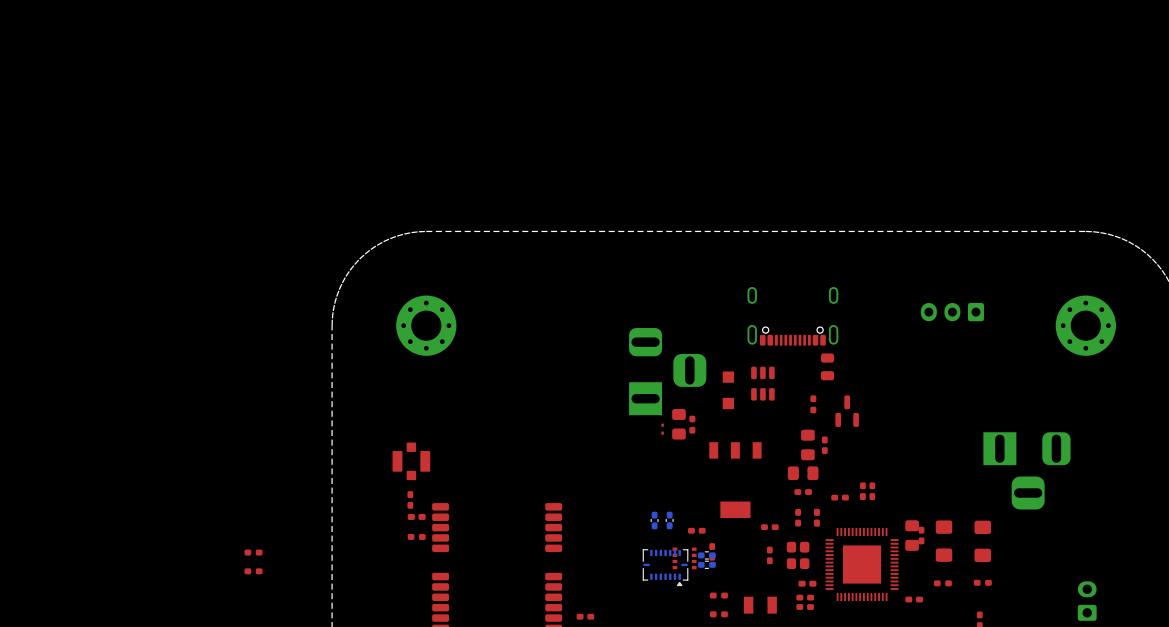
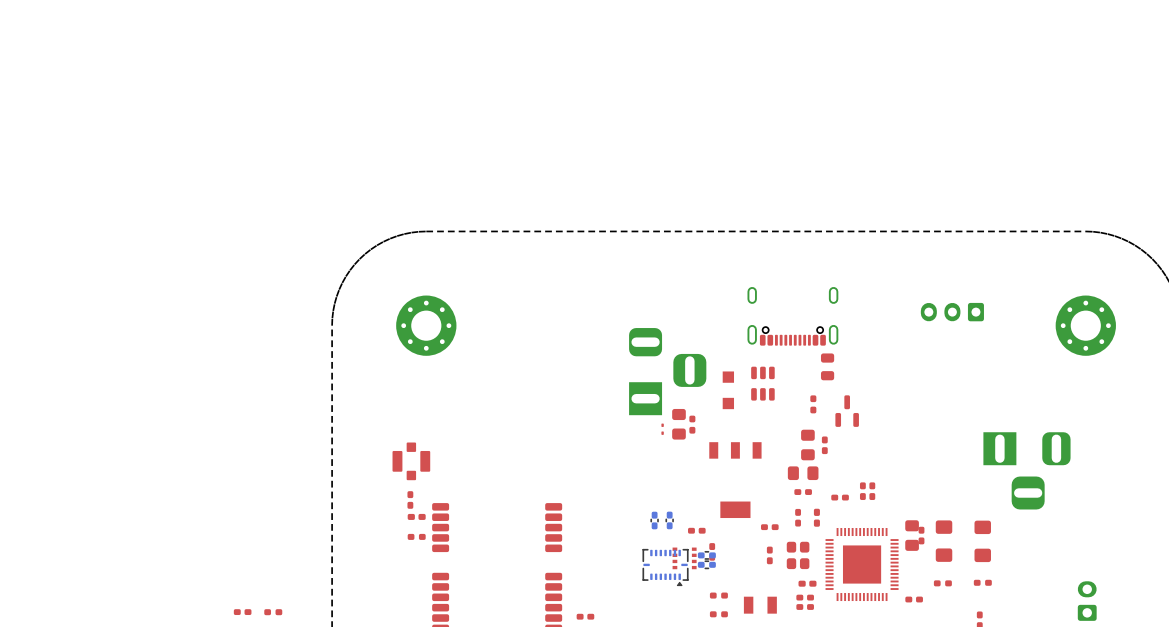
part: (253, 552) -> none
part: (253, 571) -> none
part: none -> (242, 612)
part: none -> (273, 612)

